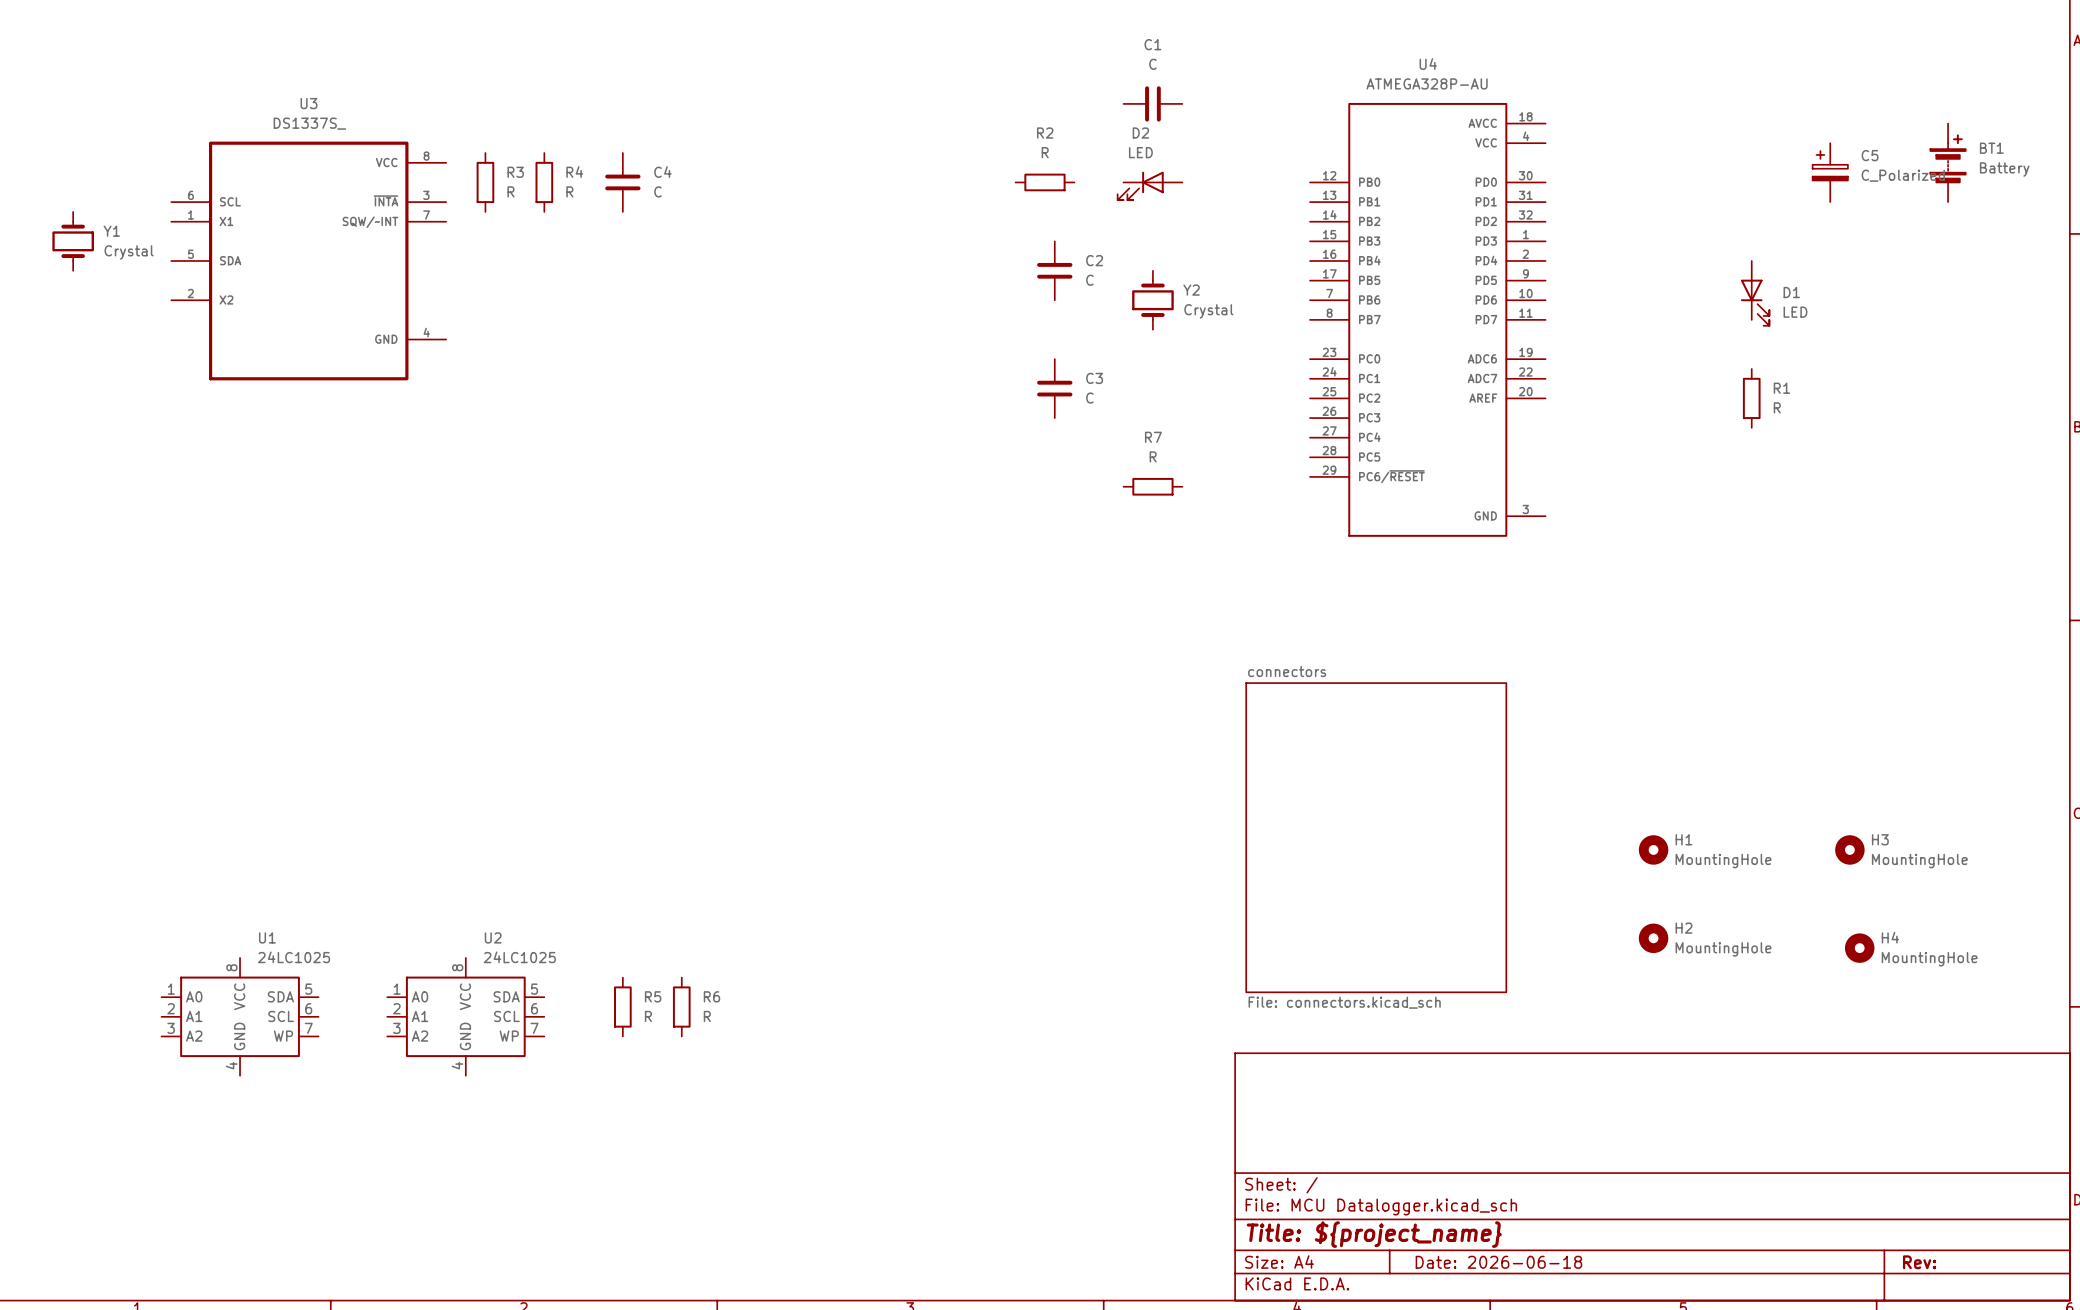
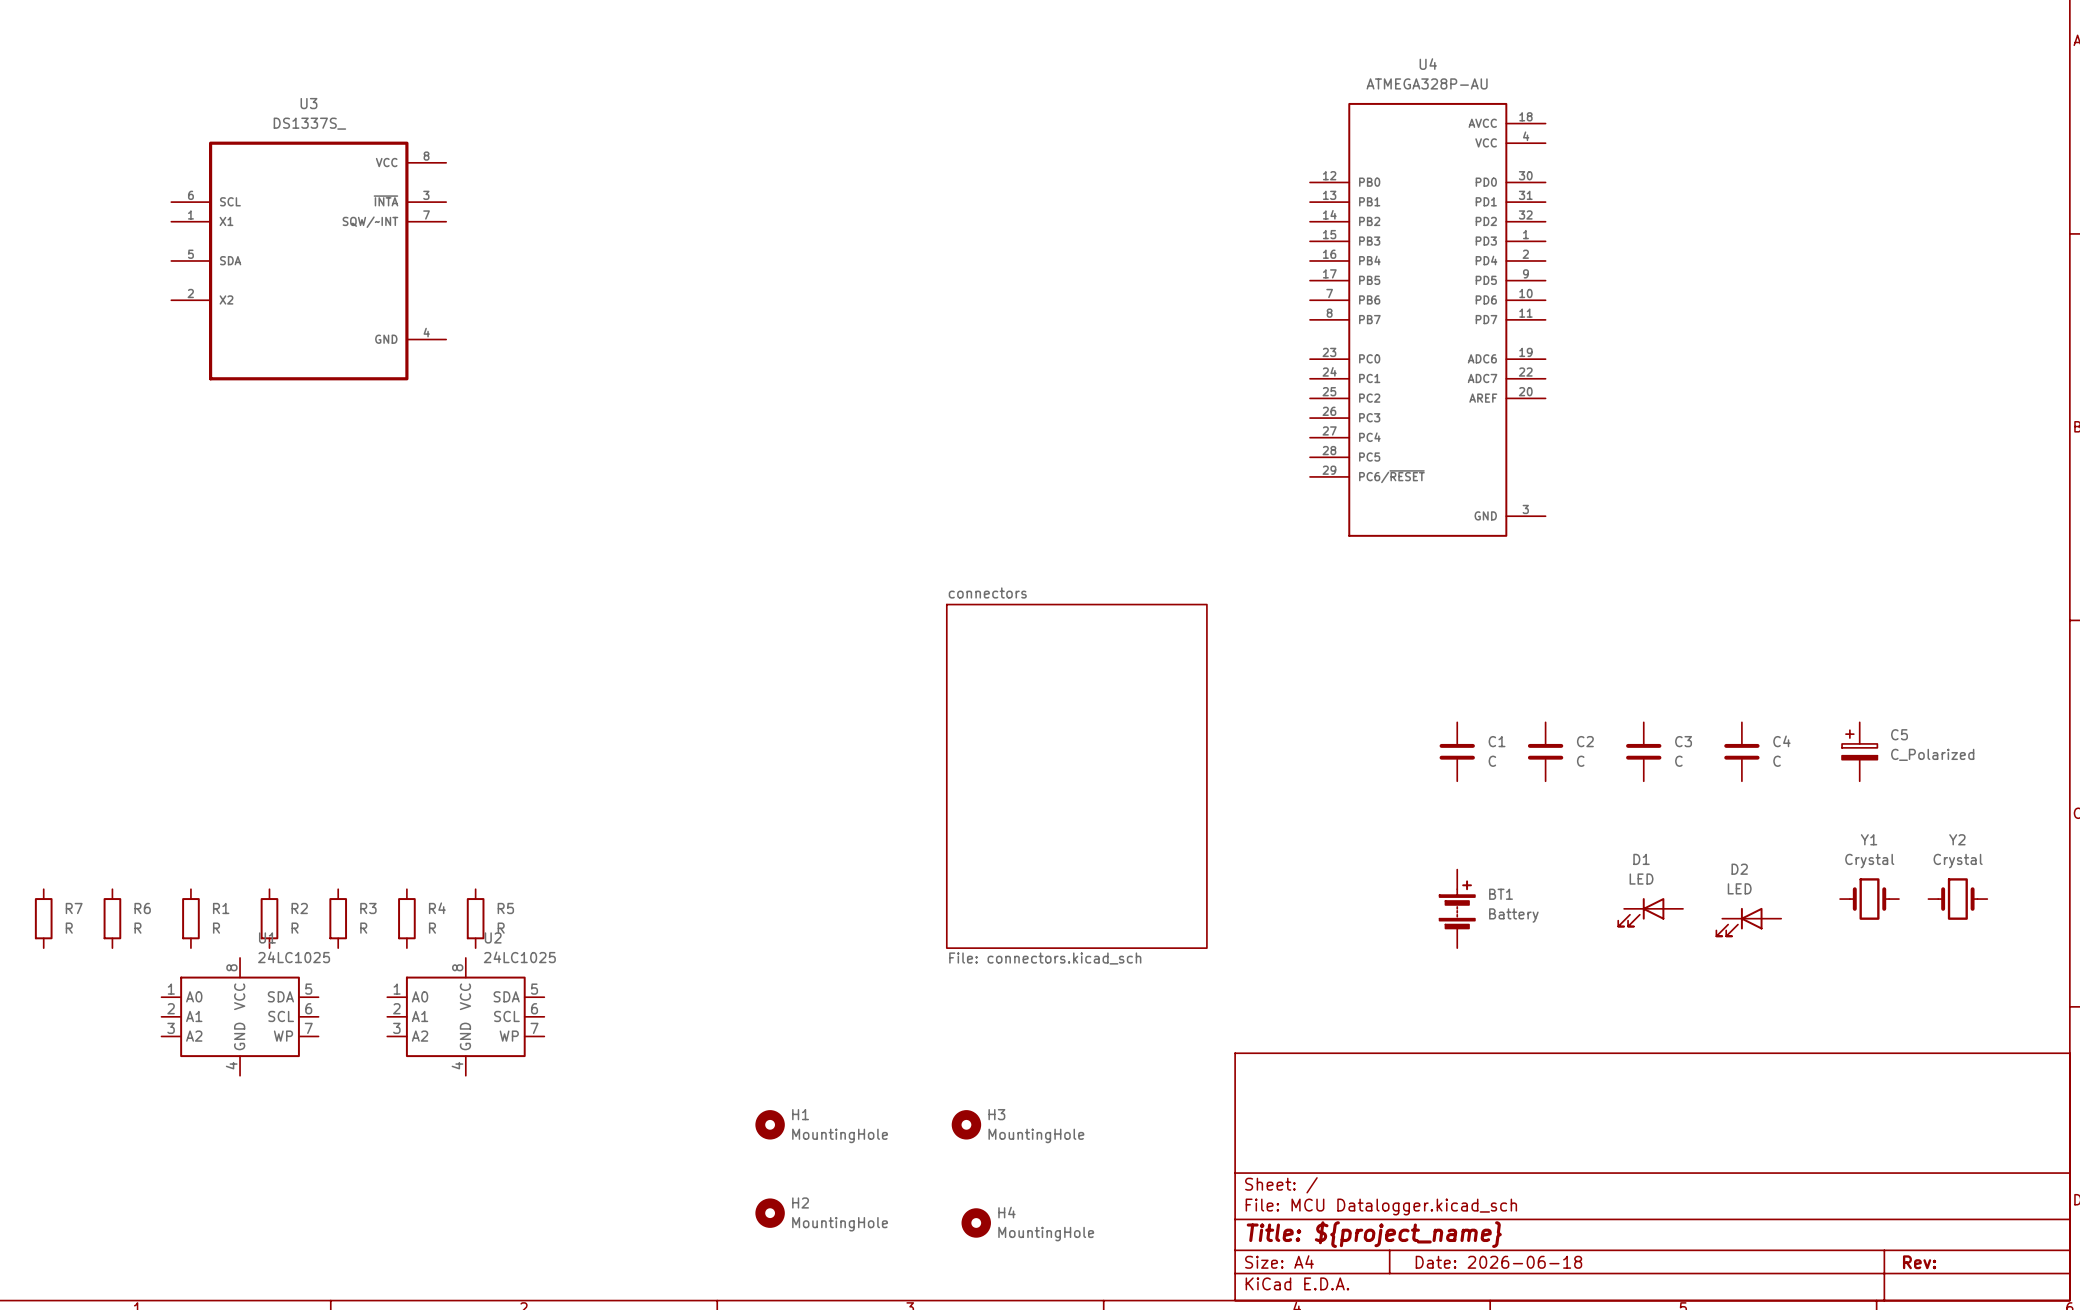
C1 name position: C1 (1152, 44) -> C1 (1497, 741)
C1 rotation: 0° (1152, 103) -> 90° clockwise (1457, 751)
C1 position: (1152, 103) -> (1457, 751)
R2 name position: R2 (1045, 133) -> R2 (299, 908)
BT1 position: (1948, 162) -> (1457, 908)
C5 position: (1830, 172) -> (1859, 751)
R3 position: (485, 182) -> (338, 918)
R4 position: (544, 182) -> (406, 918)
C4 position: (622, 182) -> (1741, 751)
R2 rotation: 0° (1044, 182) -> 90° clockwise (269, 918)
R2 position: (1044, 182) -> (269, 918)
D2 position: (1149, 185) -> (1748, 922)
Y1 name position: Y1 (111, 231) -> Y1 (1869, 839)
Y1 rotation: 0° (73, 241) -> 90° clockwise (1869, 899)
Y1 position: (73, 241) -> (1869, 899)
Y1 value position: Crystal (129, 252) -> Crystal (1869, 861)
C2 position: (1054, 270) -> (1545, 751)
Y2 name position: Y2 (1191, 290) -> Y2 (1957, 839)
D1 name position: D1 (1791, 292) -> D1 (1641, 859)
D1 position: (1755, 293) -> (1650, 912)
Y2 rotation: 0° (1152, 300) -> 90° clockwise (1957, 899)
Y2 position: (1152, 300) -> (1957, 899)
D1 rotation: 0° (1755, 302) -> 90° clockwise (1641, 912)
Y2 value position: Crystal (1208, 311) -> Crystal (1958, 861)
D1 value position: LED (1795, 312) -> LED (1641, 879)
C3 position: (1054, 388) -> (1643, 751)
R1 position: (1751, 398) -> (190, 918)
R7 name position: R7 (1153, 437) -> R7 (74, 908)
R7 rotation: 0° (1152, 486) -> 90° clockwise (43, 918)
R7 position: (1152, 486) -> (43, 918)
sheet connectors: none -> File: connectors.kicad_sch (1076, 776)
sheet connectors: File: connectors.kicad_sch (1376, 837) -> none
H1 position: (1653, 849) -> (770, 1124)
H3 position: (1849, 849) -> (966, 1124)
H2 position: (1653, 938) -> (770, 1213)
H4 position: (1859, 948) -> (976, 1222)
R5 position: (622, 1007) -> (475, 918)
R6 position: (681, 1007) -> (112, 918)

